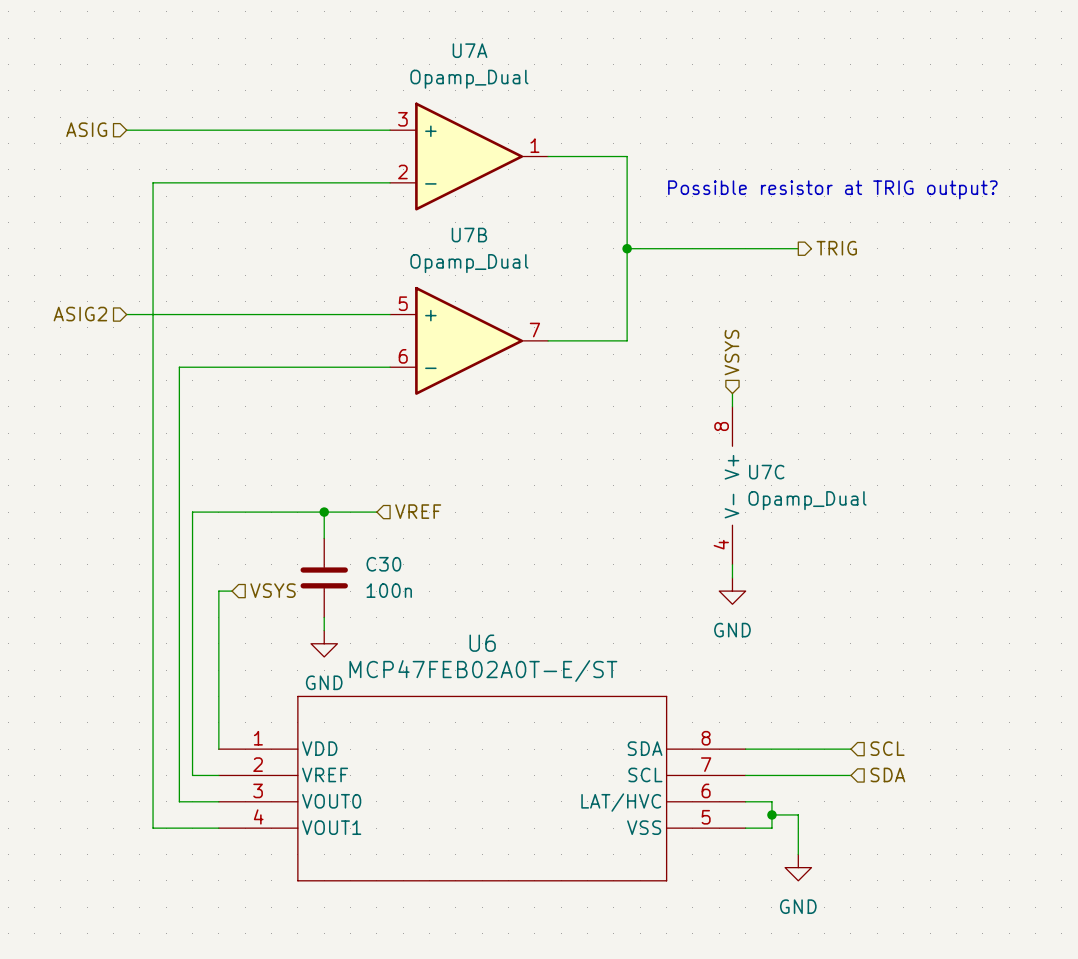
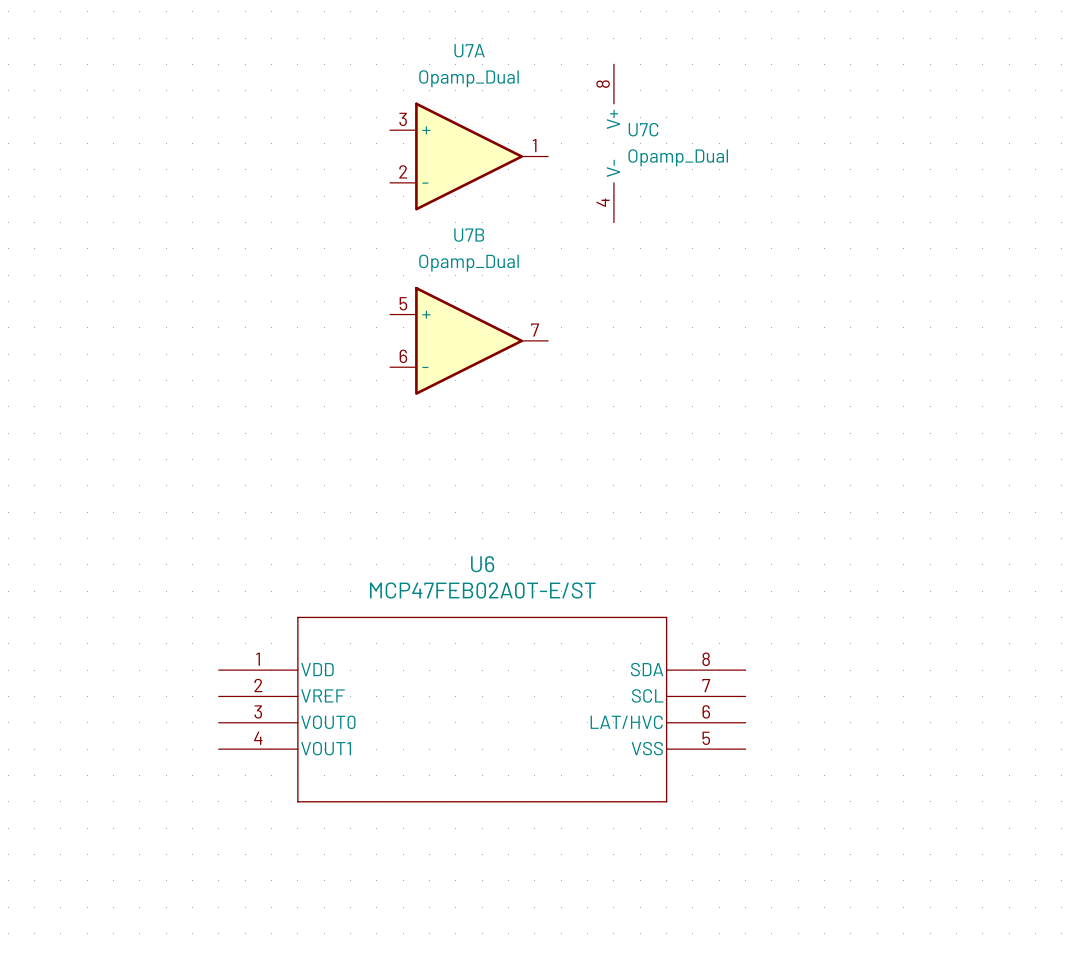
hierarchical label: ASIG (86, 129) -> none
wire: (126, 130) (390, 130) -> none
wire: (548, 156) (627, 156) (627, 340) (548, 340) -> none
wire: (390, 182) (153, 182) (153, 828) (218, 828) -> none
text: Possible resistor at TRIG output? (832, 189) -> none
wire: (627, 248) (798, 248) -> none
junction: (627, 248) -> none
hierarchical label: TRIG (836, 248) -> none
hierarchical label: ASIG2 (80, 314) -> none
wire: (126, 314) (390, 314) -> none
hierarchical label: VSYS (731, 352) -> none
wire: (390, 367) (179, 367) (179, 801) (218, 801) -> none
wire: (732, 393) (732, 406) -> none
U7C position: (732, 485) -> (613, 143)
hierarchical label: VREF (418, 511) -> none
wire: (324, 512) (324, 538) -> none
junction: (324, 512) -> none
wire: (376, 512) (192, 512) (192, 775) (218, 775) -> none
wire: (732, 564) (732, 577) -> none
C30: 100n (324, 577) -> none
hierarchical label: VSYS (273, 590) -> none
wire: (232, 591) (218, 591) (218, 749) -> none
power symbol: GND (732, 591) -> none
wire: (324, 617) (324, 630) -> none
power symbol: GND (324, 643) -> none
hierarchical label: SCL (887, 748) -> none
wire: (745, 749) (850, 749) -> none
hierarchical label: SDA (887, 774) -> none
wire: (745, 775) (850, 775) -> none
U6 position: (482, 788) -> (482, 709)
wire: (745, 801) (771, 801) (771, 828) (745, 828) -> none
wire: (771, 814) (798, 814) (798, 854) -> none
junction: (771, 814) -> none
power symbol: GND (798, 867) -> none

